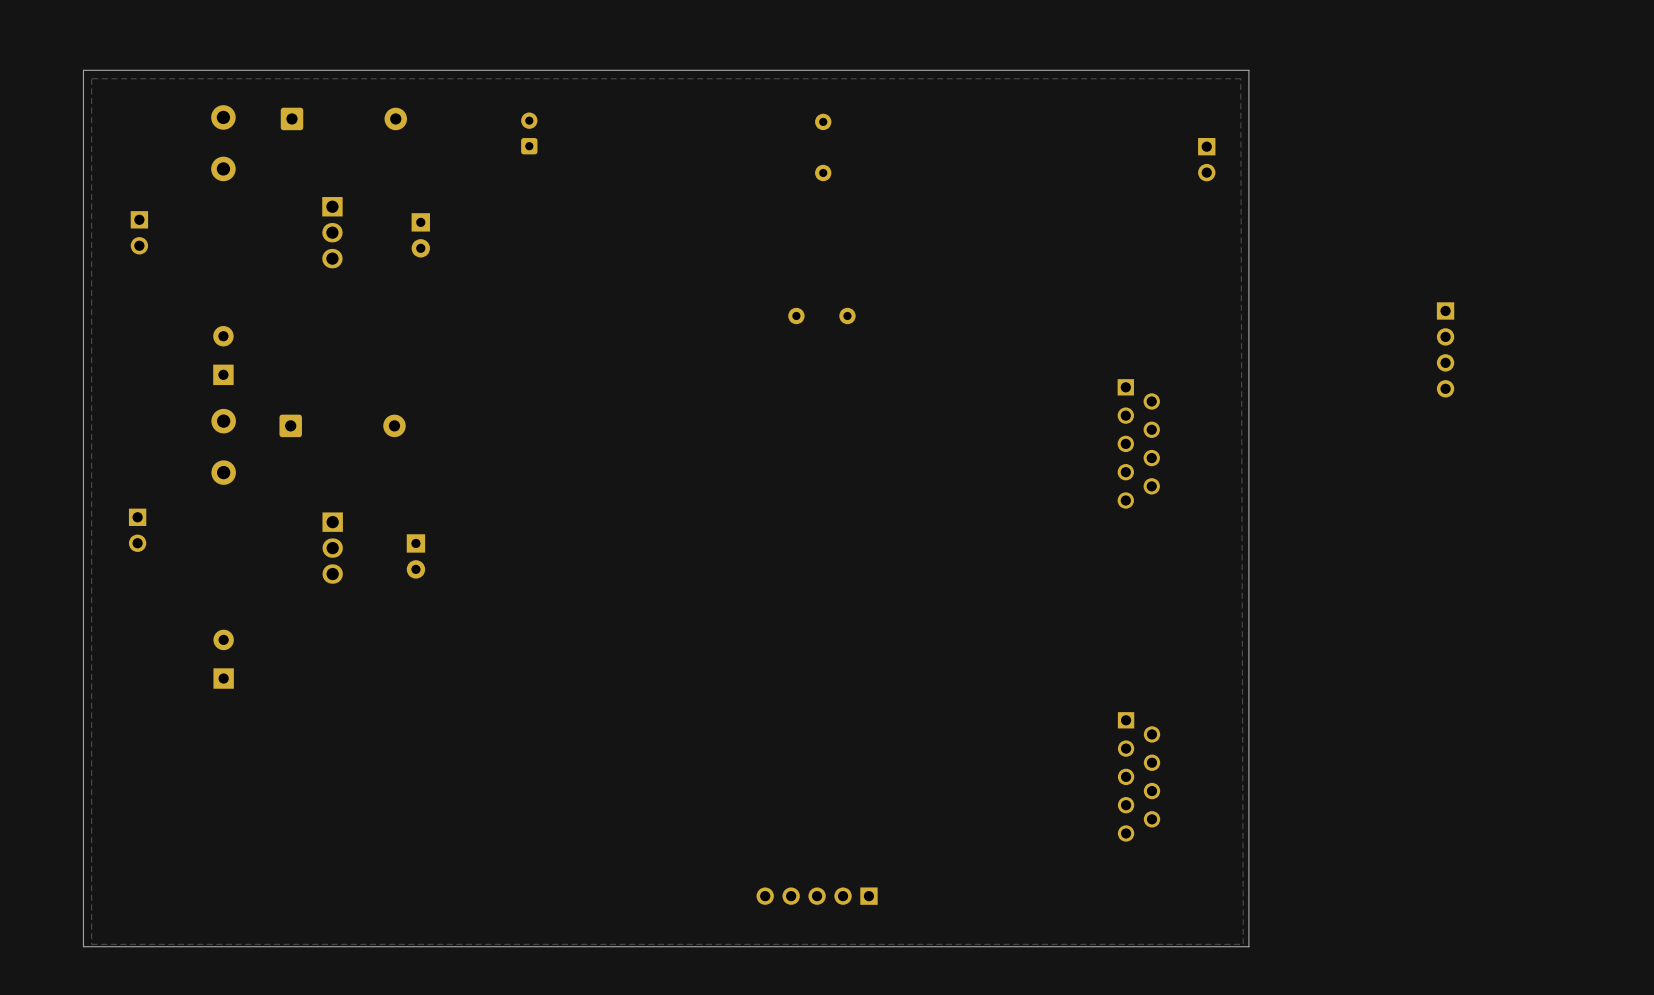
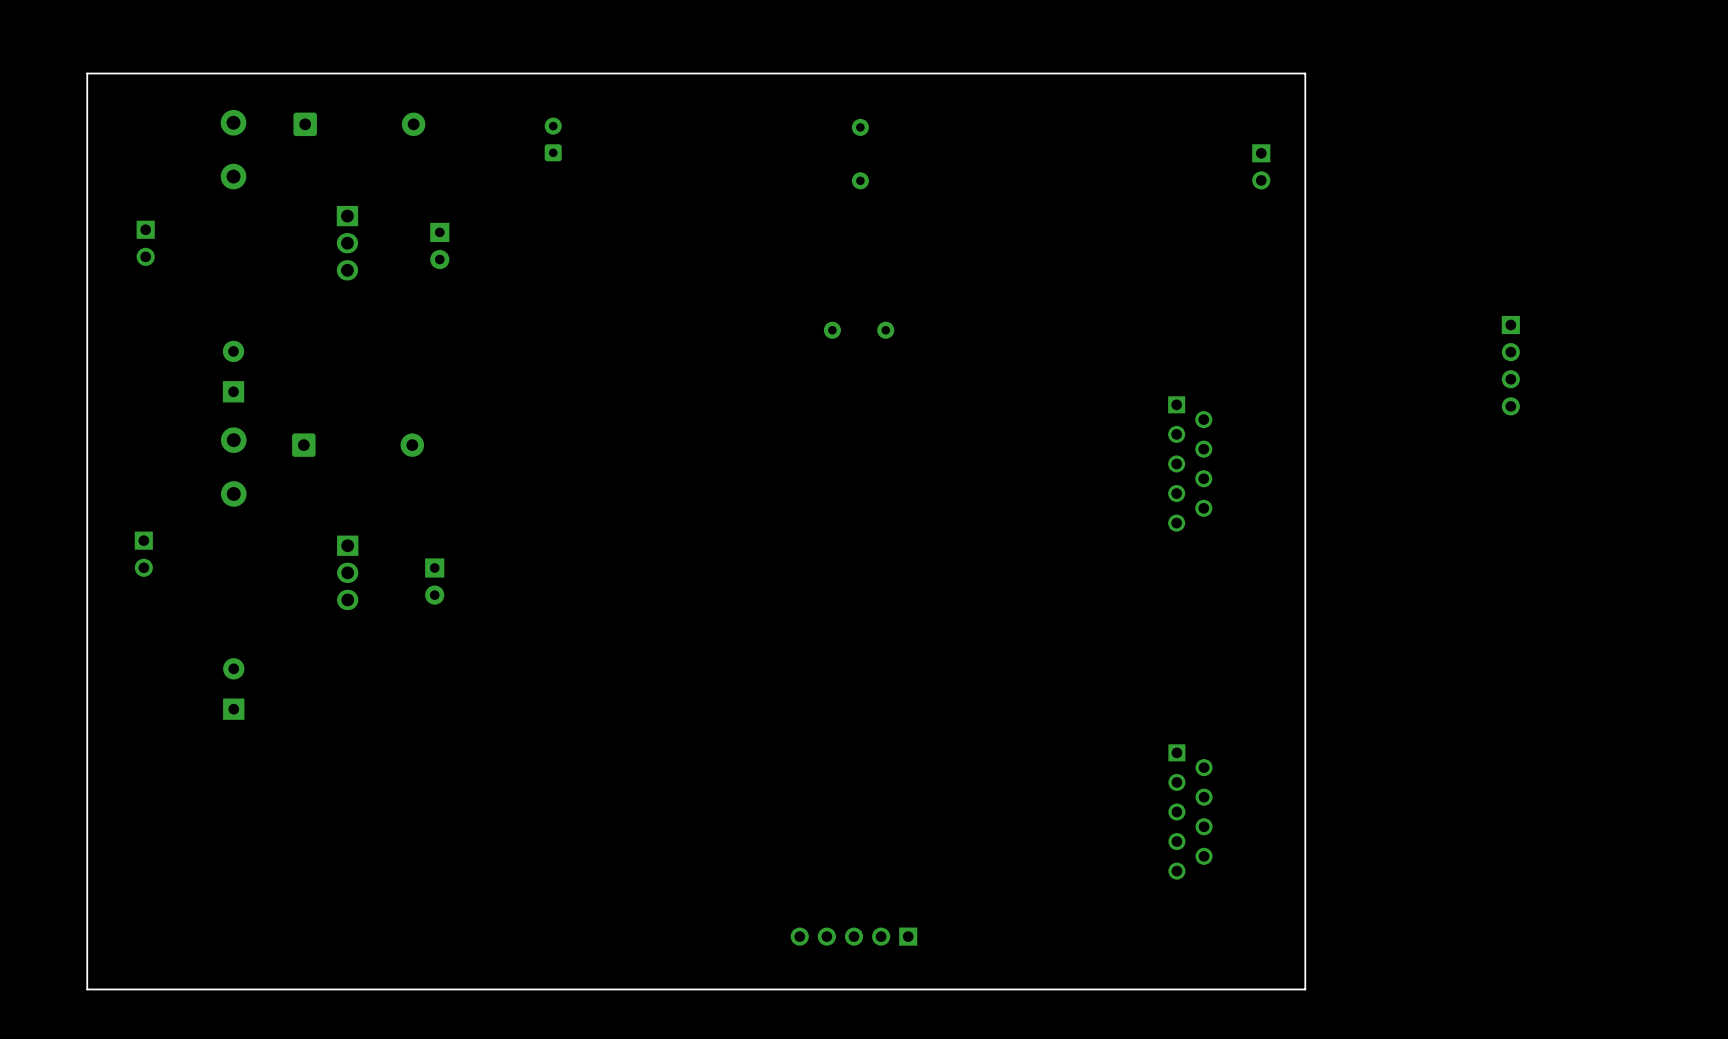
zone outline: (1240, 78) (91, 78) (91, 944) (1243, 944) (1240, 78) -> none

